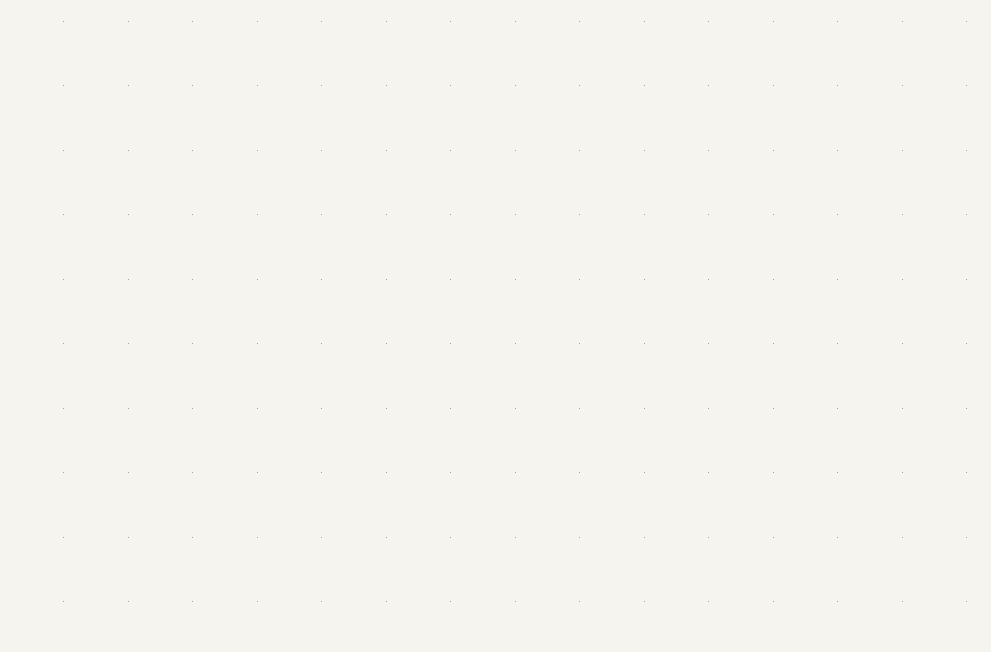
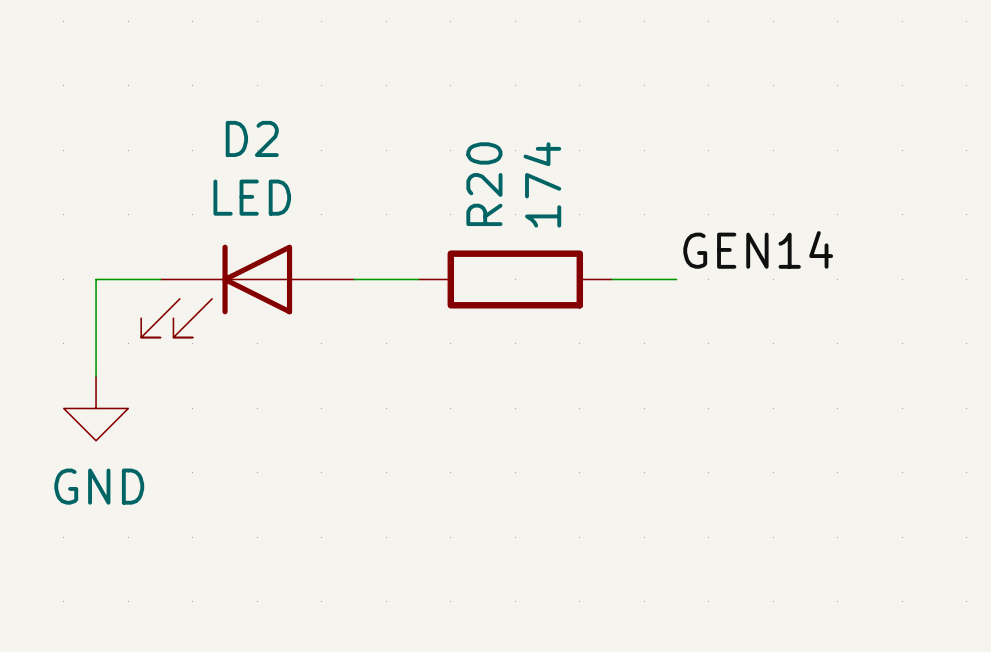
label: none -> GEN14 (758, 249)
wire: none -> (160, 279) (96, 279) (96, 376)
wire: none -> (354, 279) (418, 279)
R20: none -> 174 (515, 279)
wire: none -> (612, 279) (676, 279)
D2: none -> LED (247, 291)
power symbol: none -> GND (96, 408)

